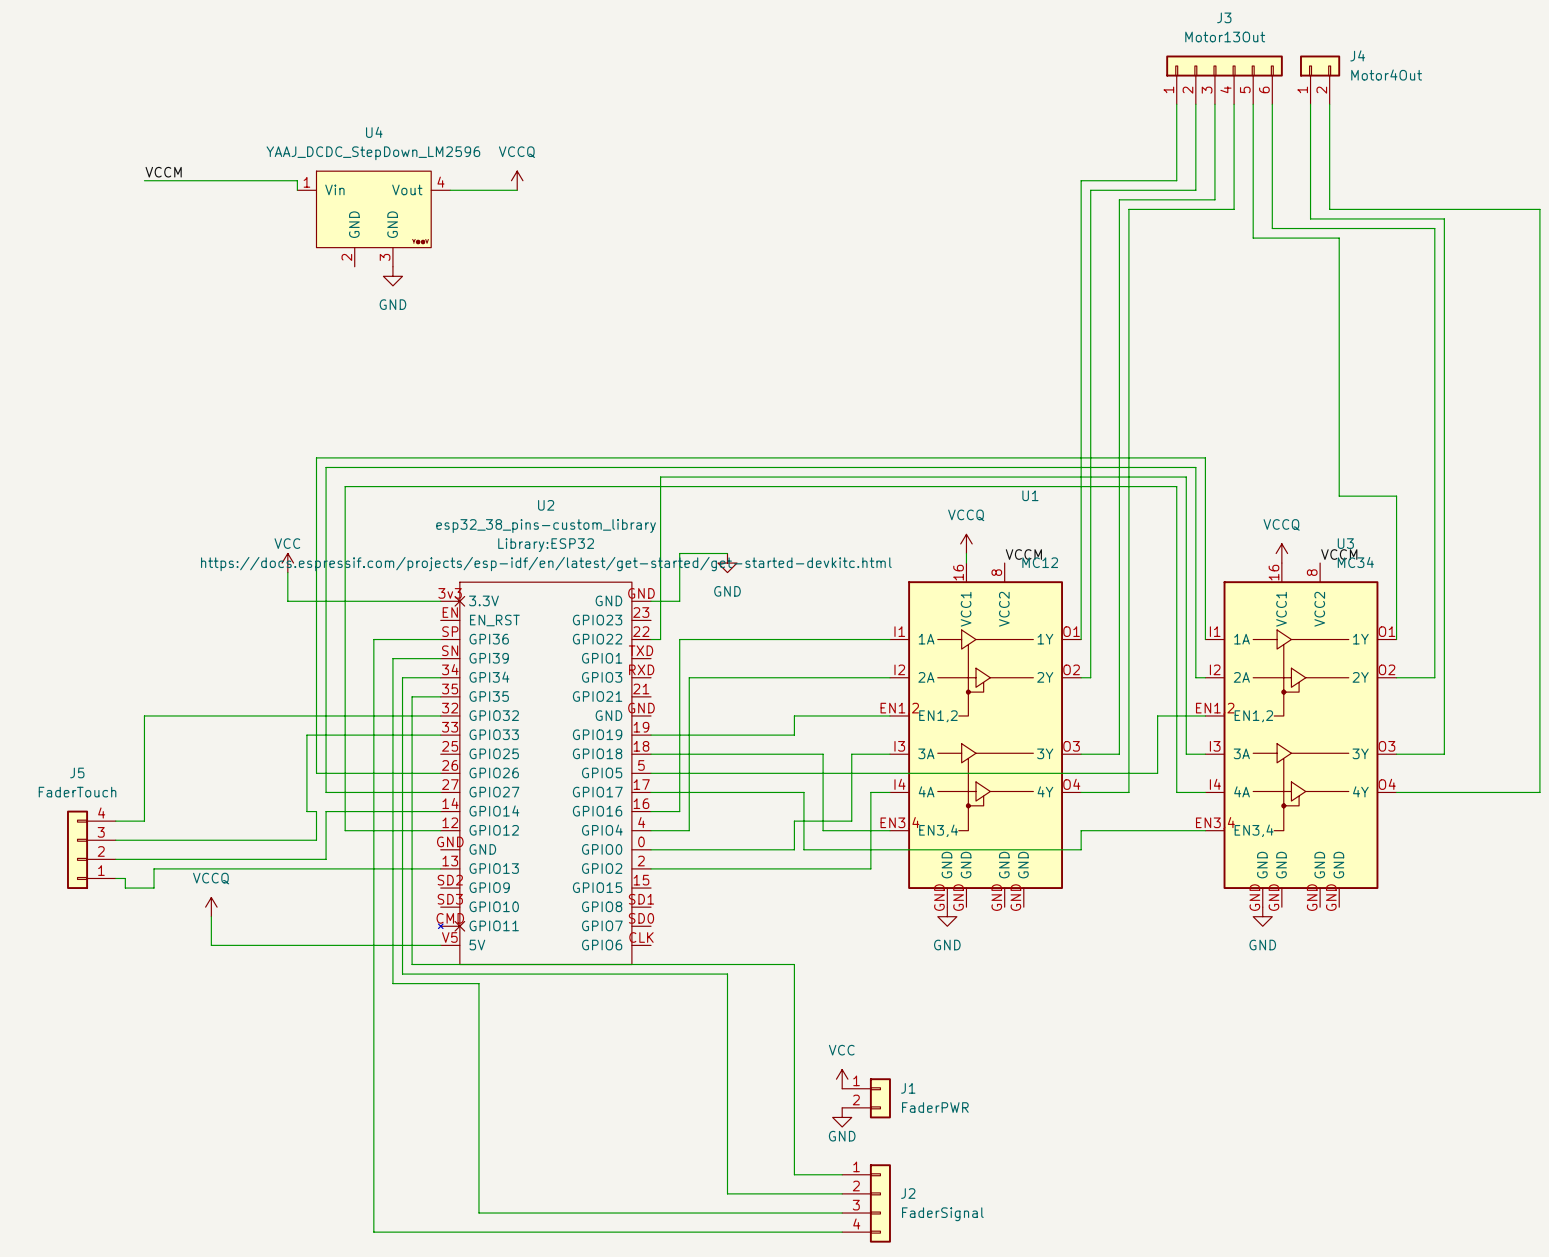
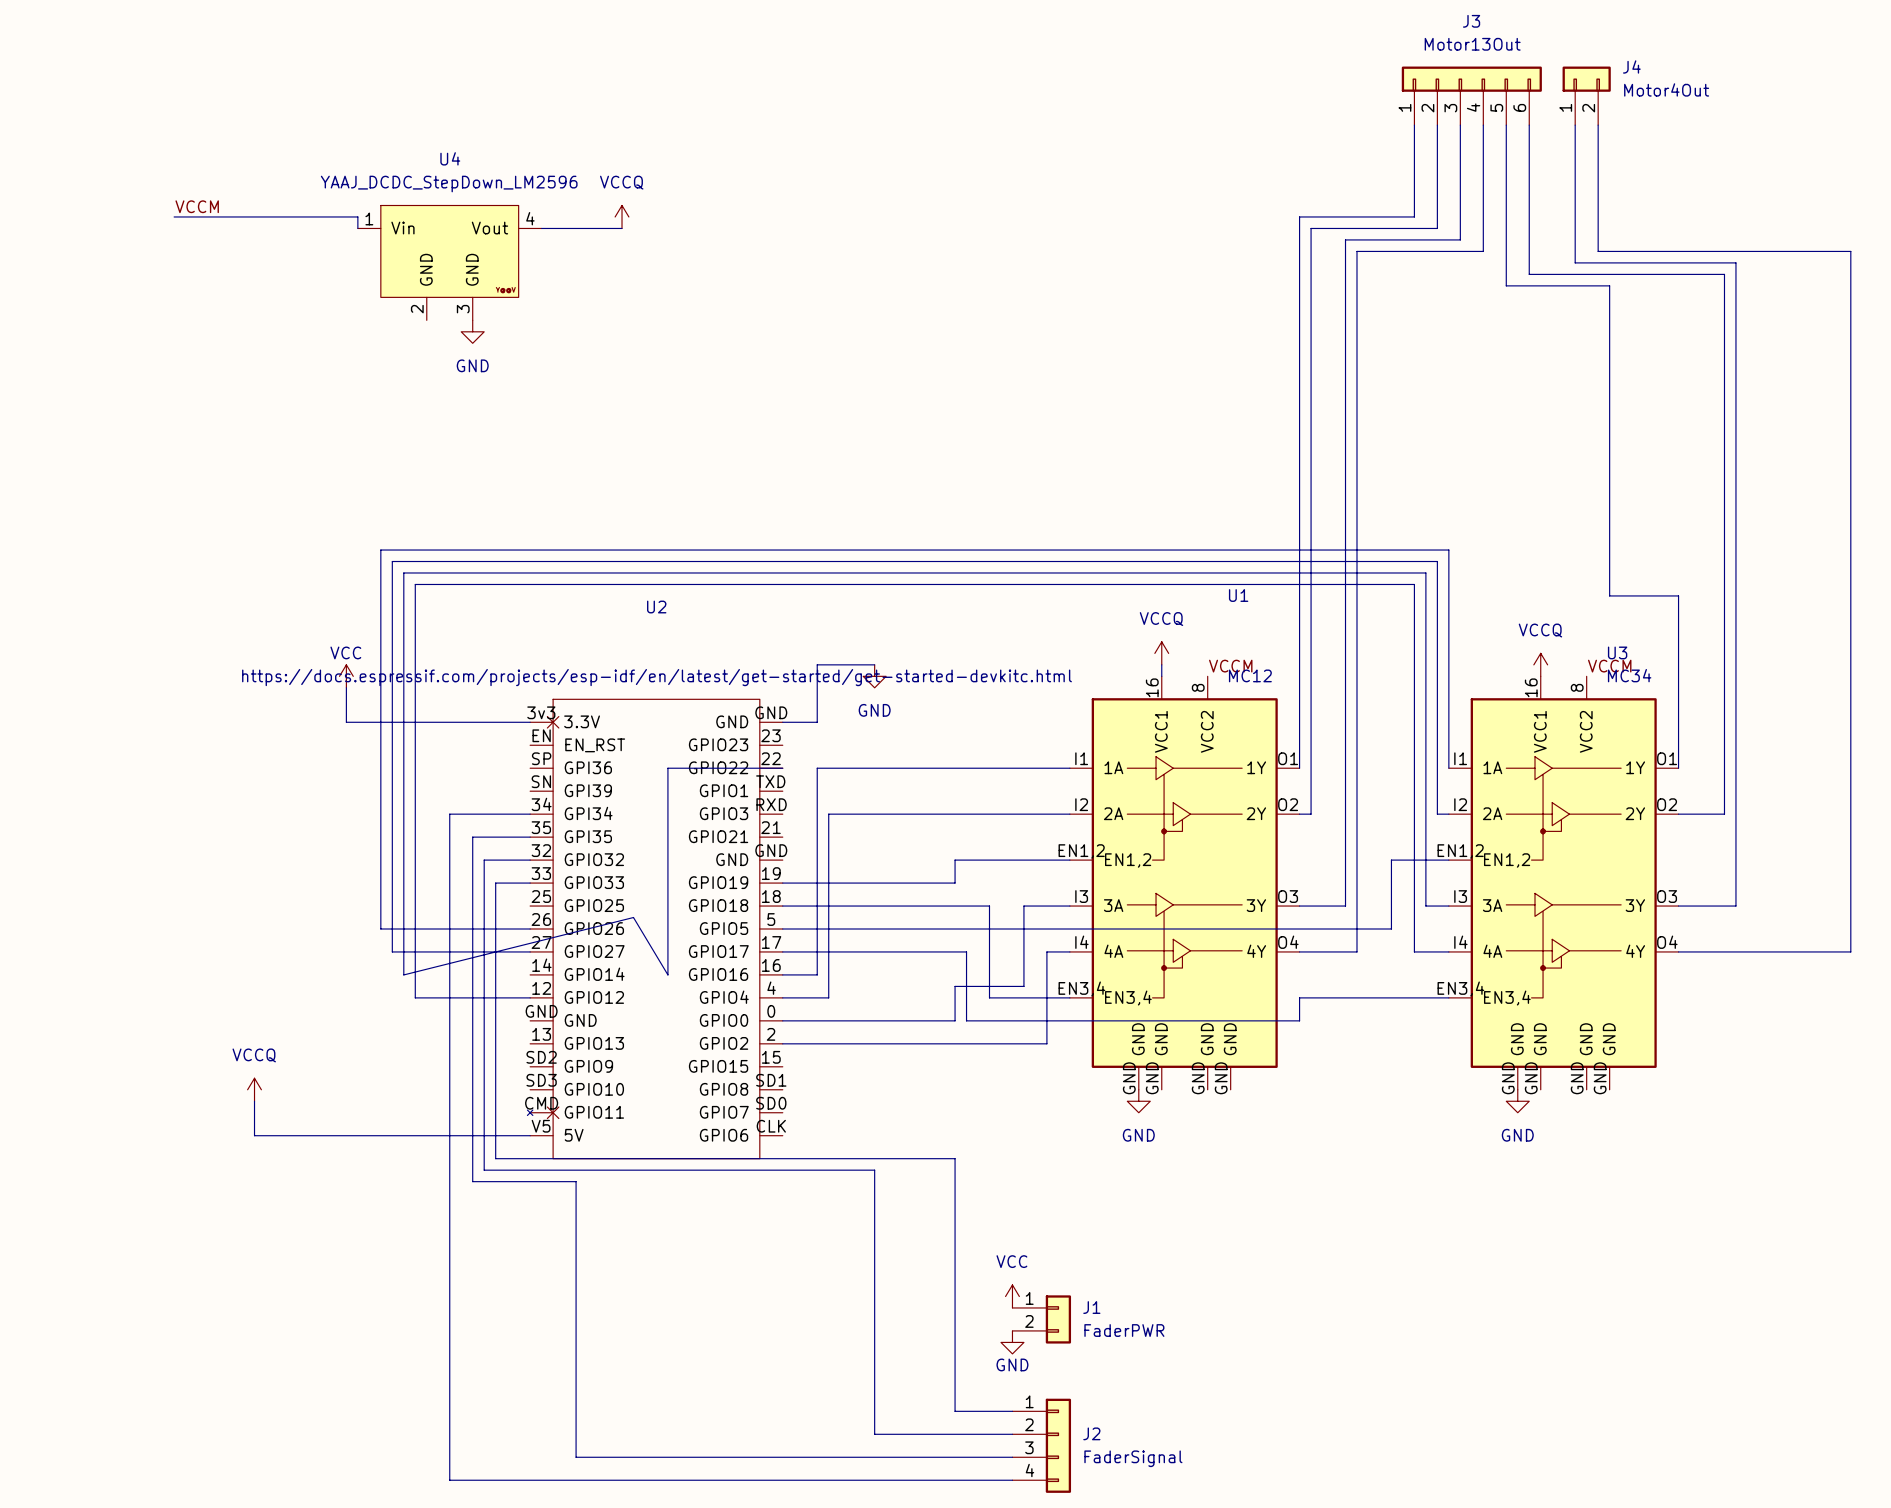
wire: (660, 477) (660, 639) (651, 639) -> (794, 572) (403, 572) (403, 974) (633, 917) (667, 974) (667, 768) (782, 768)
U2 value: esp32_38_pins-custom_library (546, 526) -> none
U2 text: Library:ESP32 (546, 545) -> none
wire: (440, 639) (373, 639) (373, 677) -> (484, 814) (449, 814)
wire: (440, 658) (392, 658) (392, 696) -> (495, 837) (472, 837)
wire: (402, 677) (402, 715) (144, 715) (144, 821) (115, 821) -> none
wire: (412, 696) (412, 735) (306, 735) (306, 811) (316, 811) (316, 840) (115, 840) -> none
wire: (440, 811) (326, 811) (326, 859) (115, 859) -> none
J5: FaderTouch (91, 849) -> none
wire: (440, 868) (154, 868) (154, 888) (125, 888) (125, 878) (115, 878) -> none

